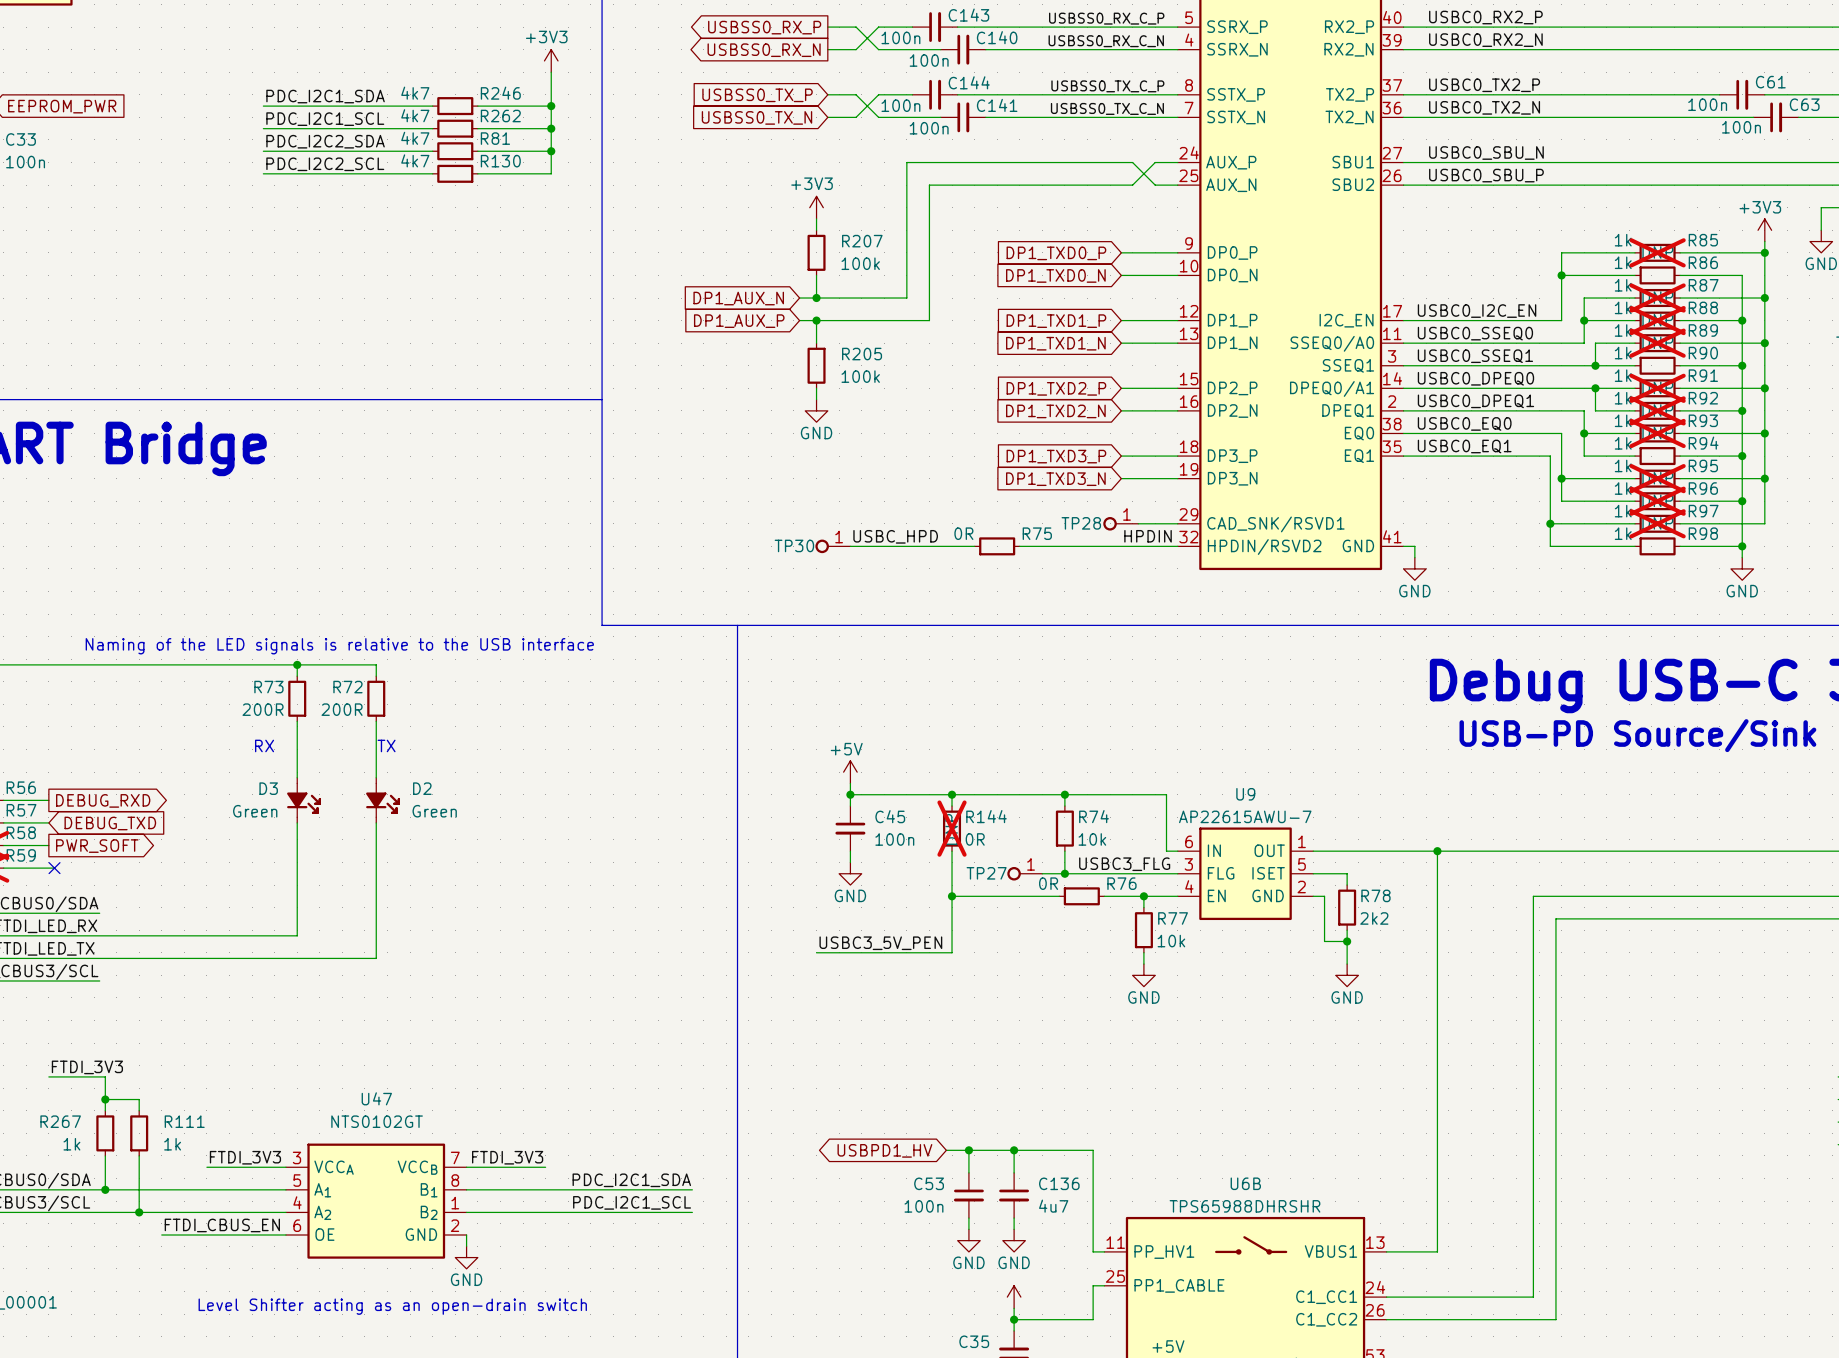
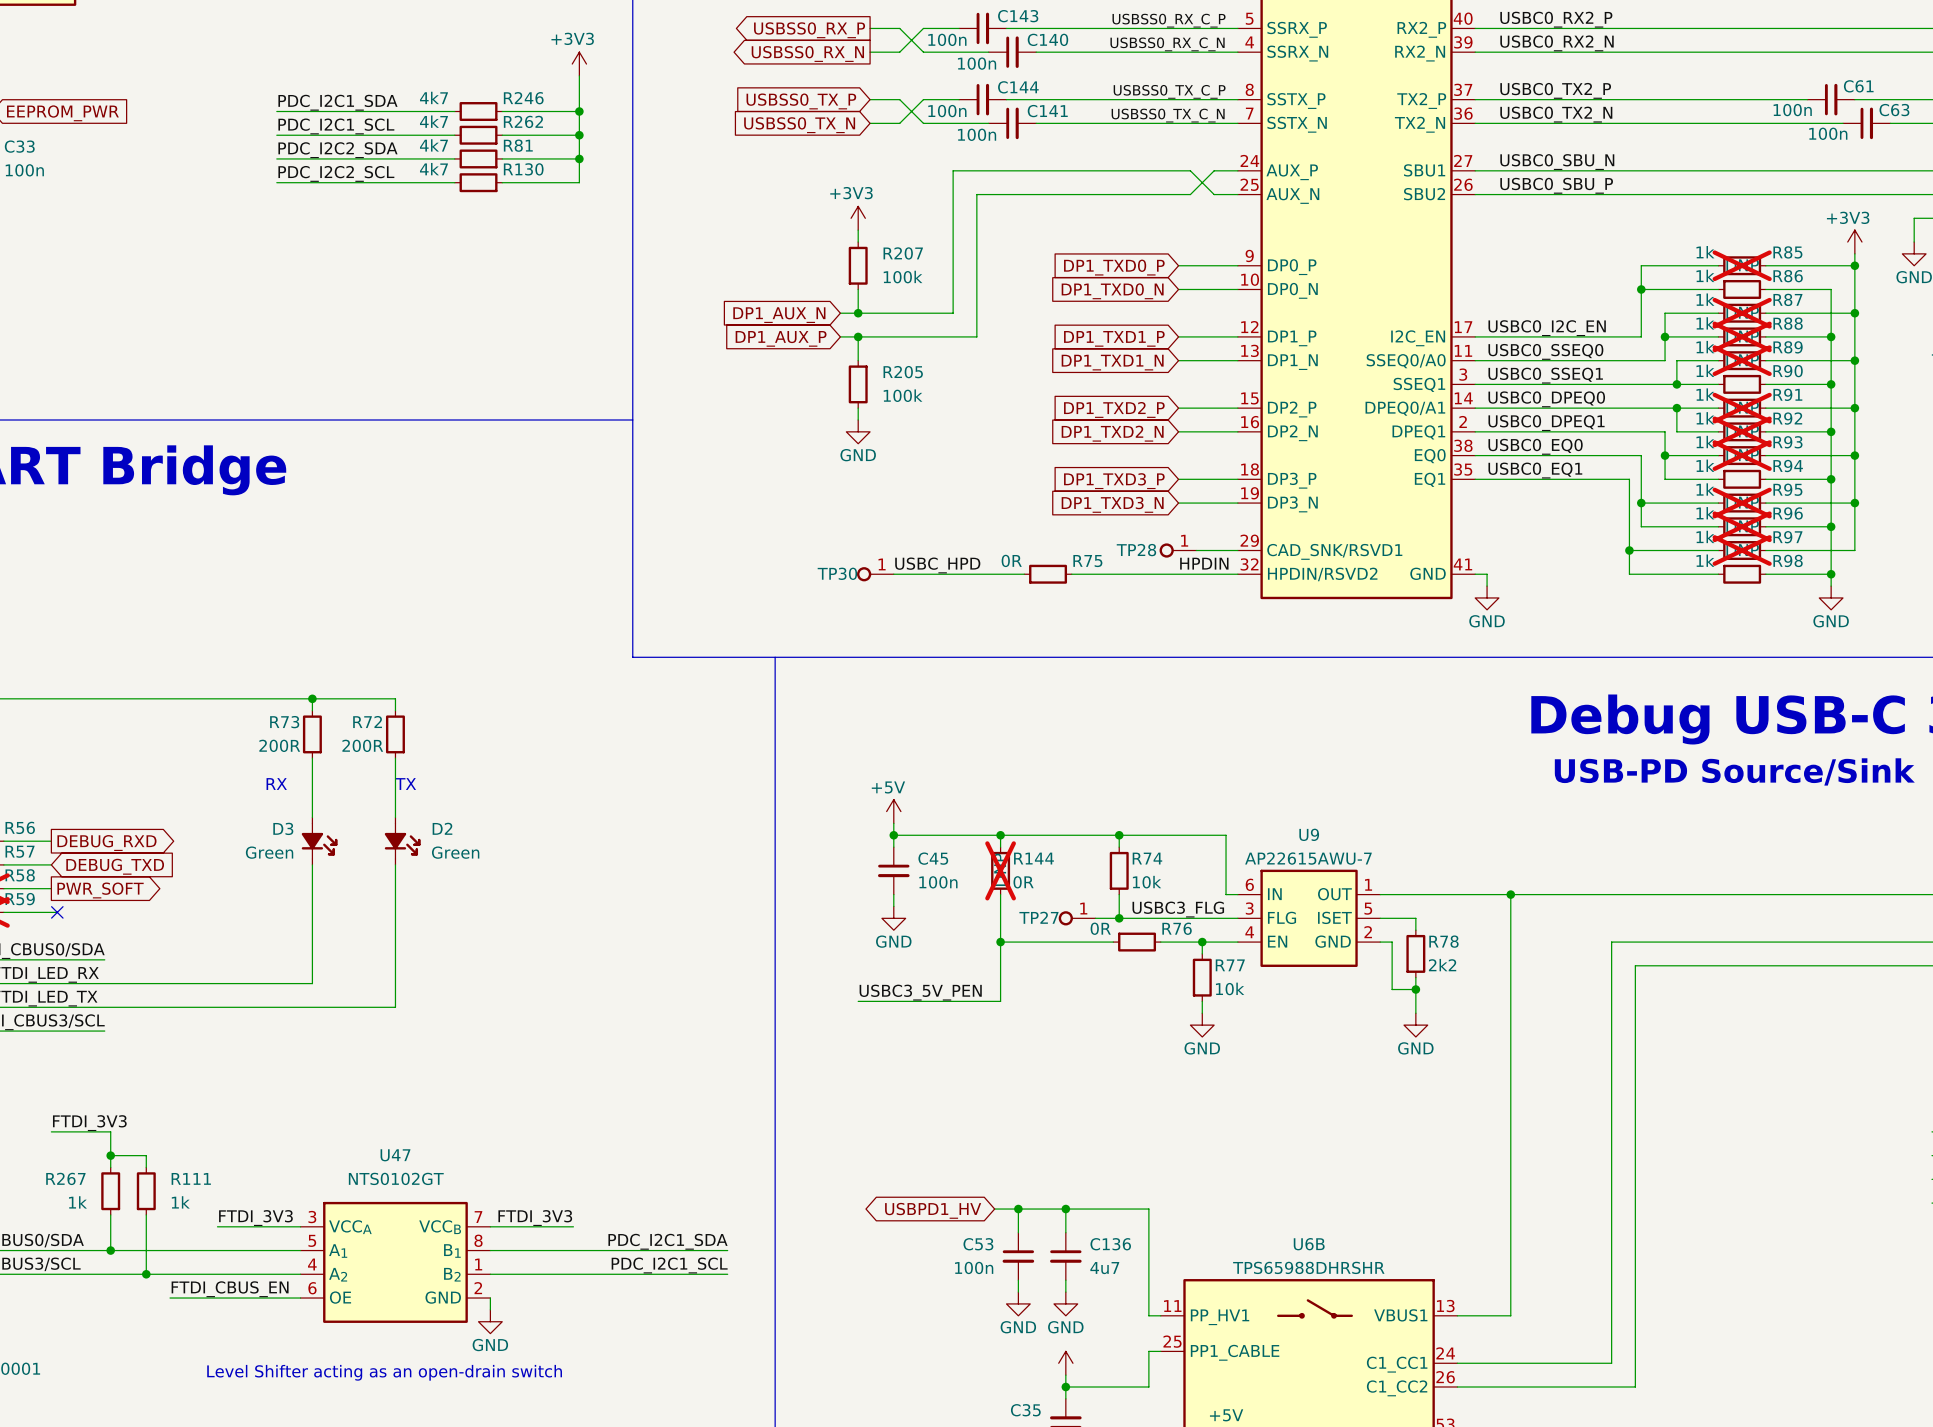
text: Naming of the LED signals is relative to the USB interface (339, 646) -> none

